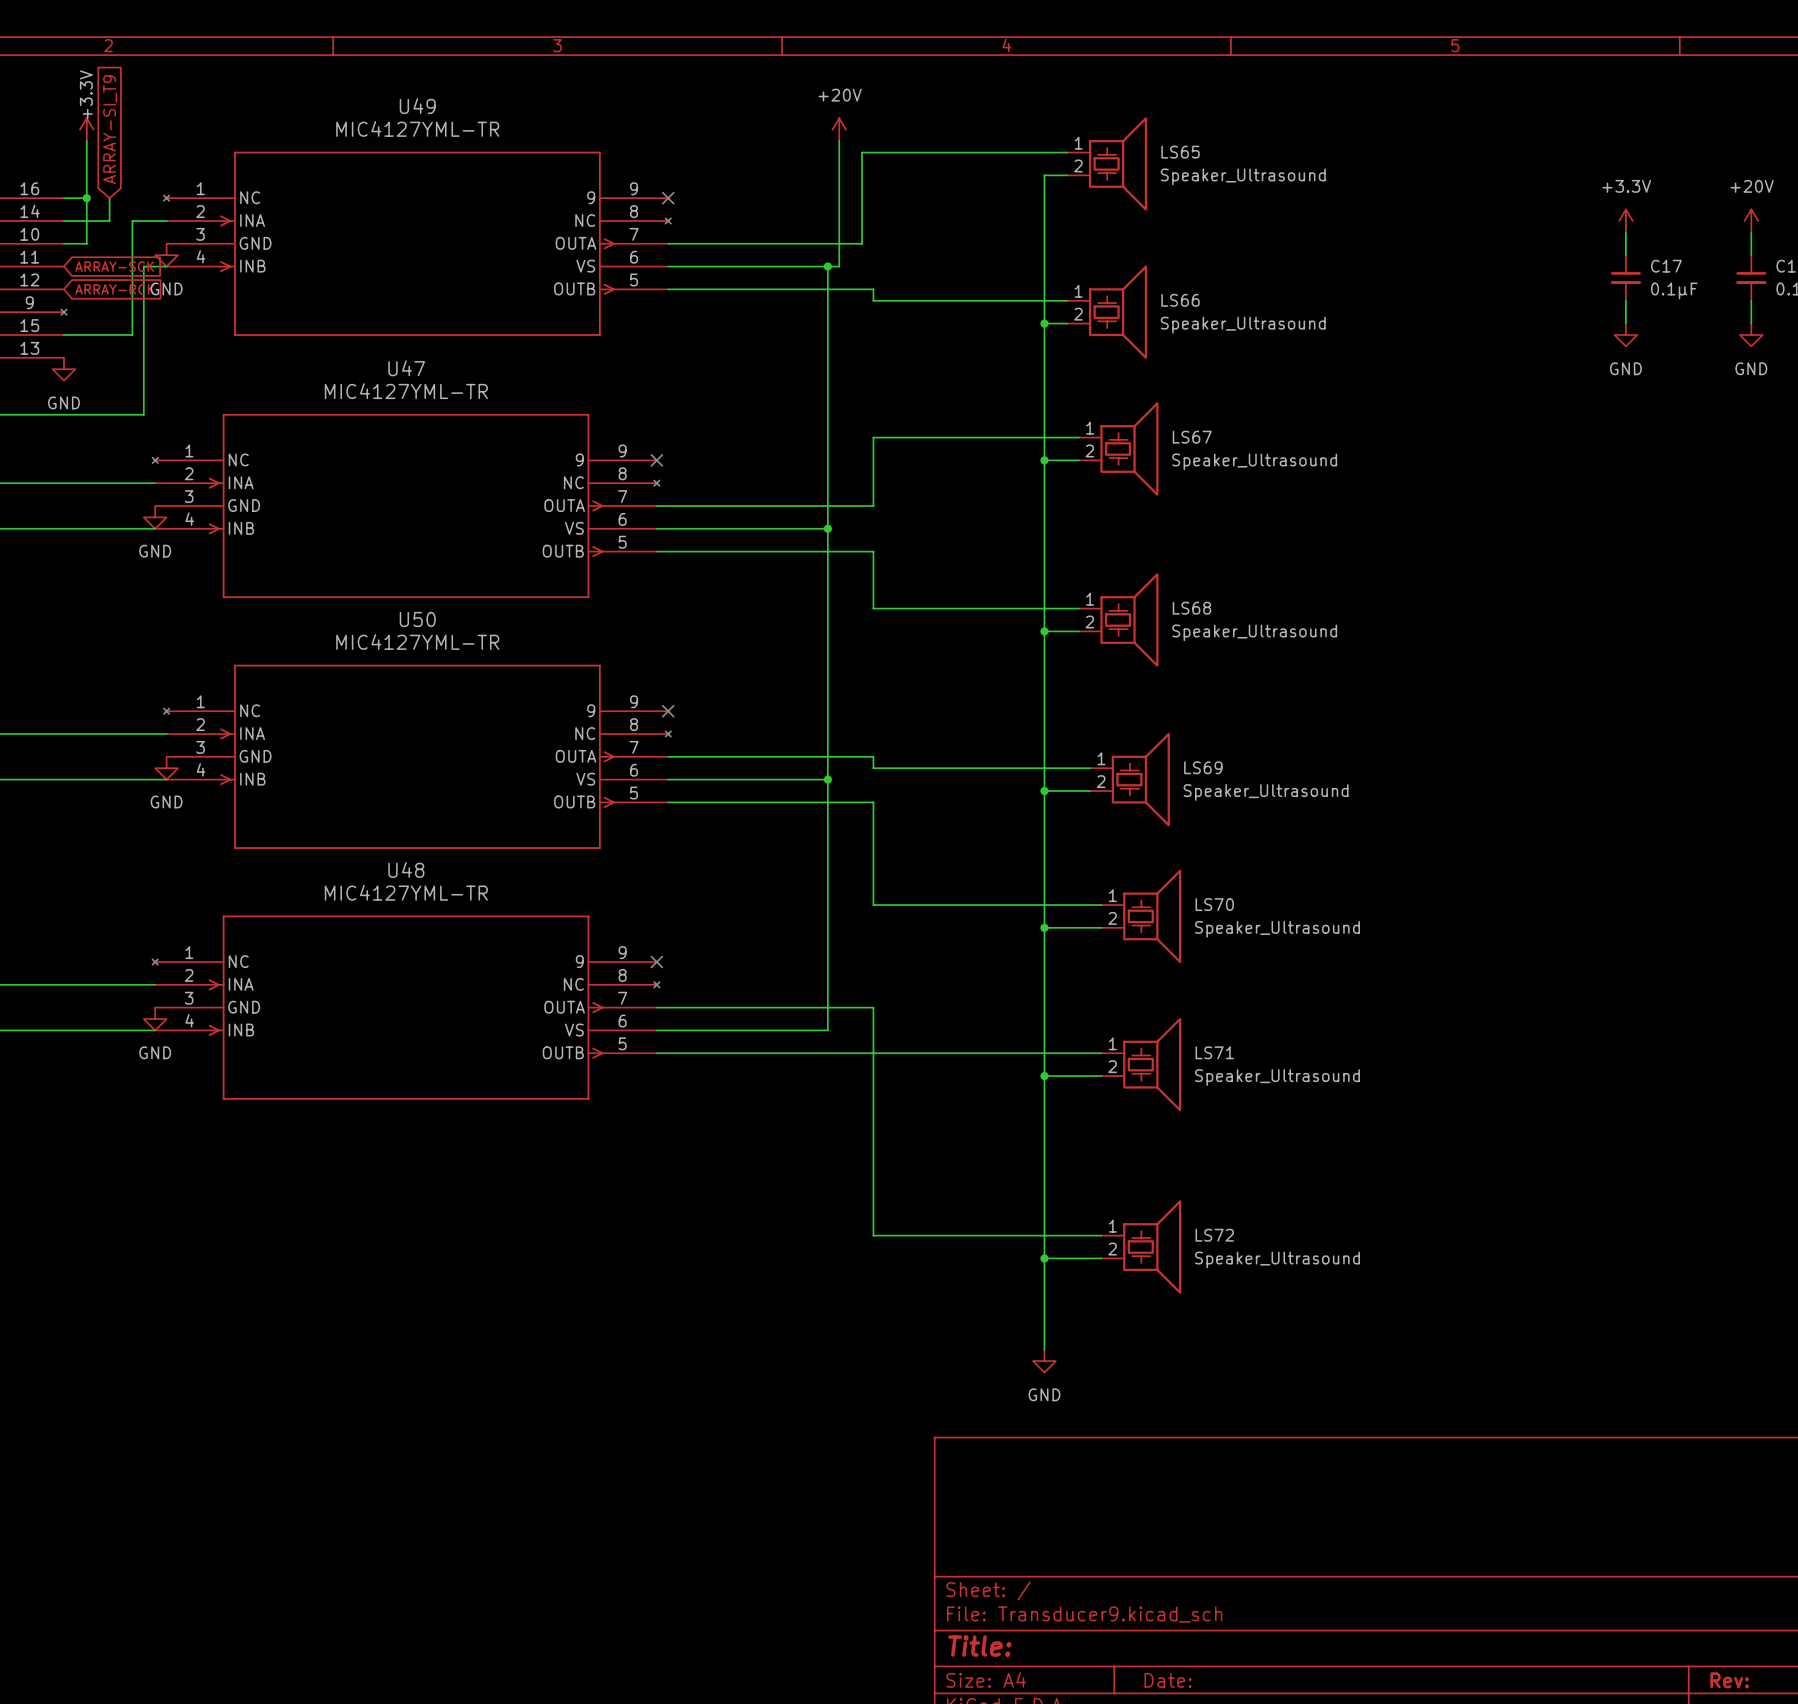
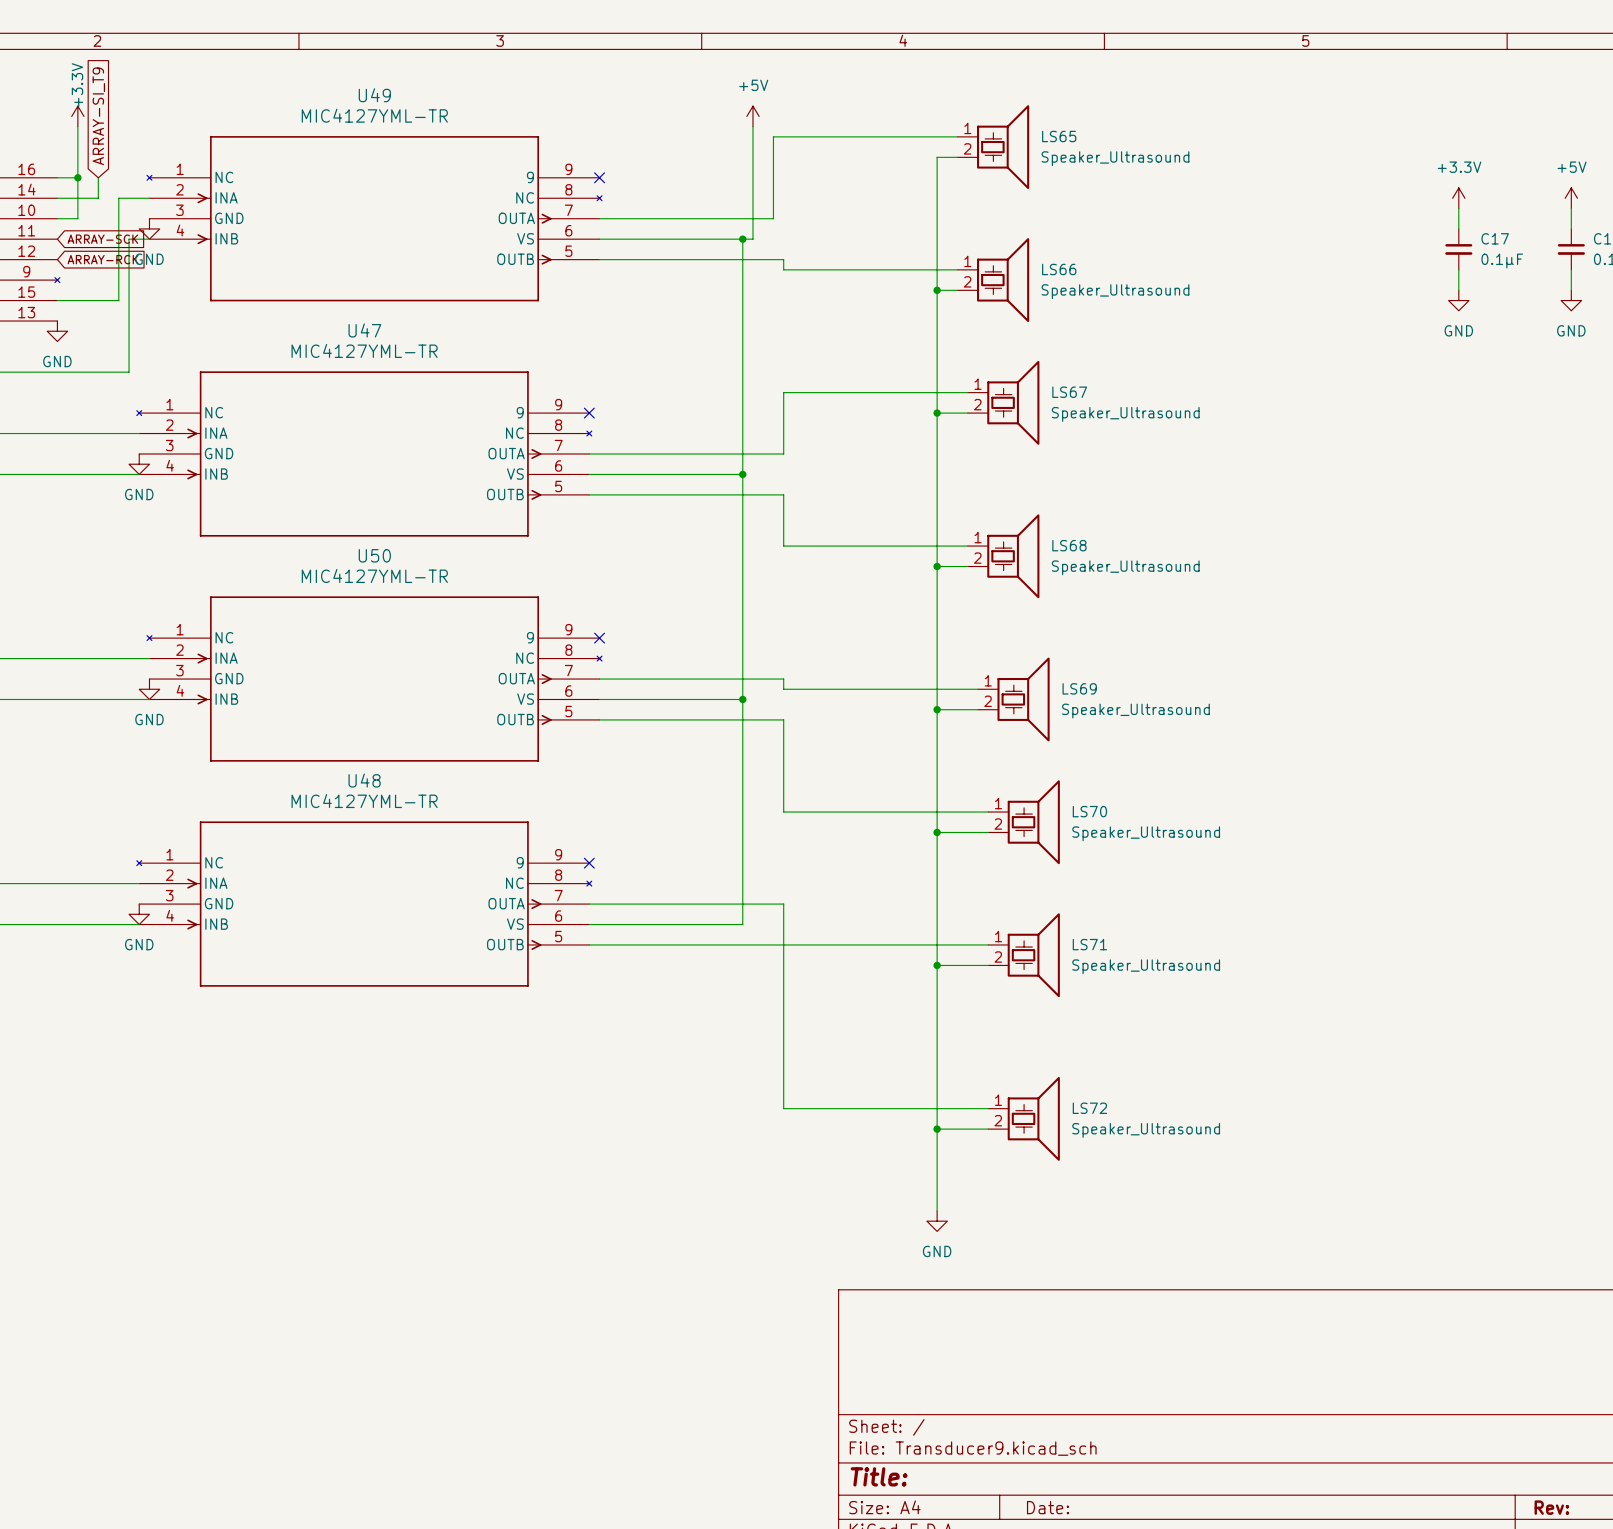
power symbol: +20V (839, 129) -> +5V (752, 116)
power symbol: +20V (1751, 220) -> +5V (1571, 198)

